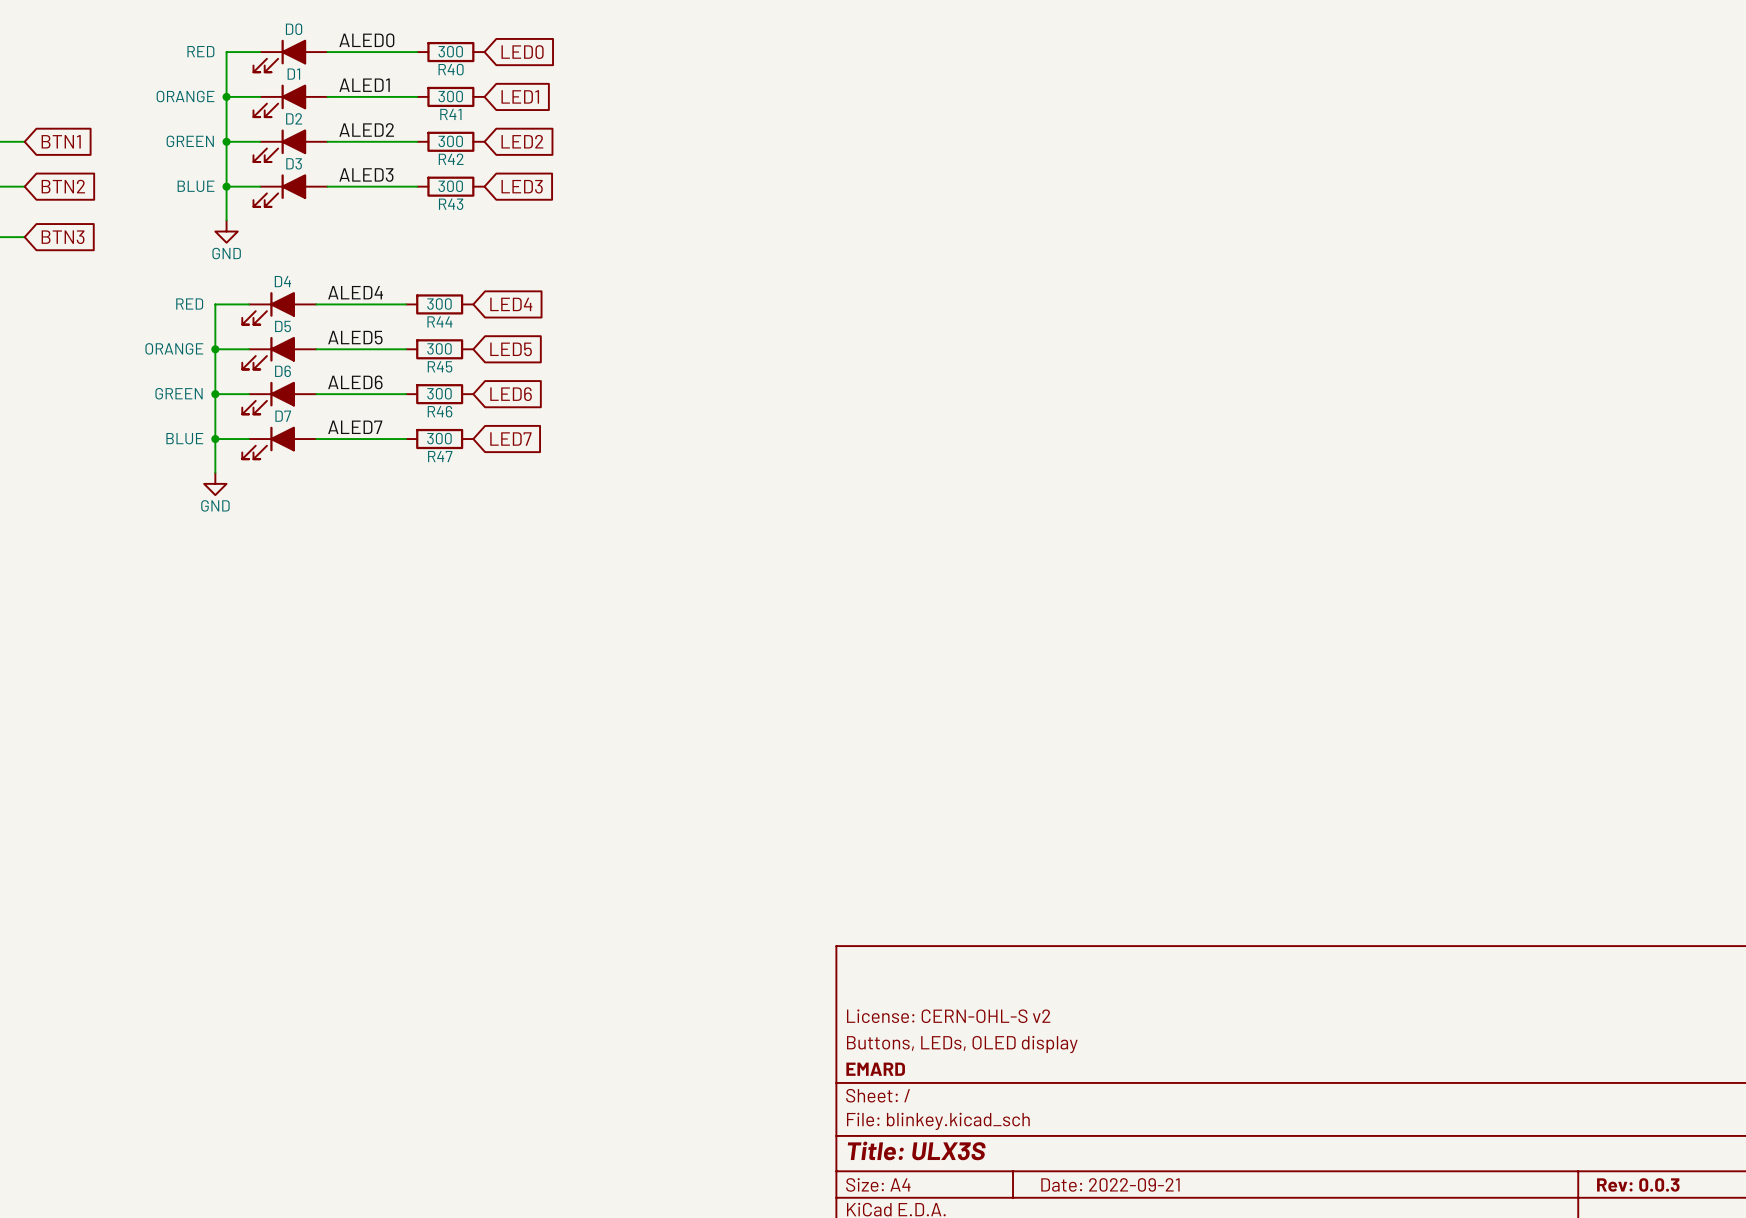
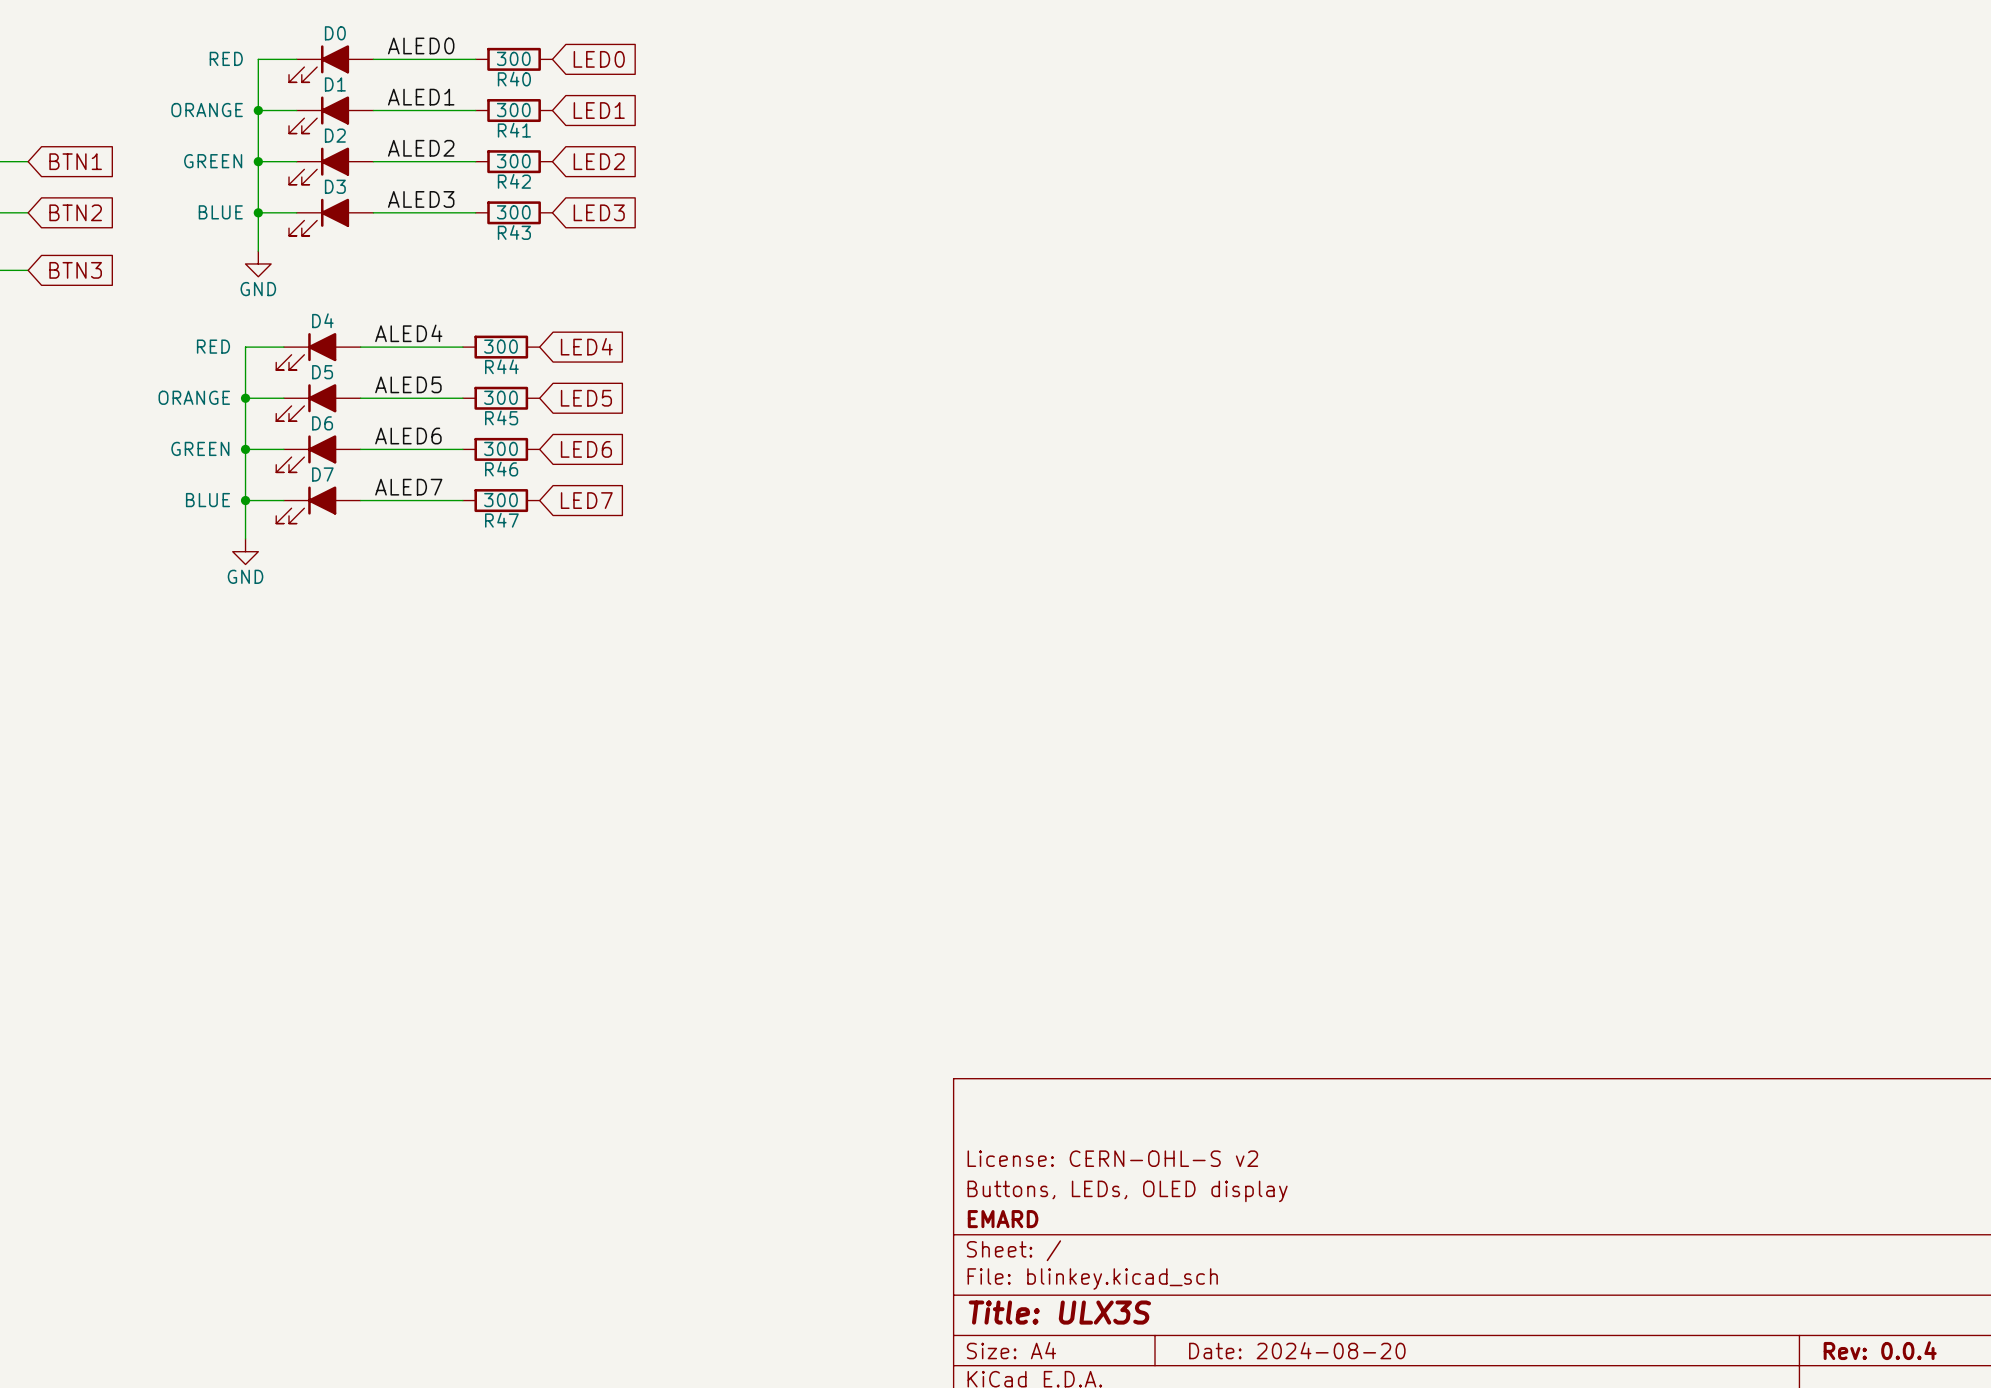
title block: Date: 2022-09-21 (1110, 1184) -> Date: 2024-08-20 (1297, 1350)
title block: Rev: 0.0.3 (1638, 1184) -> Rev: 0.0.4 (1880, 1350)

